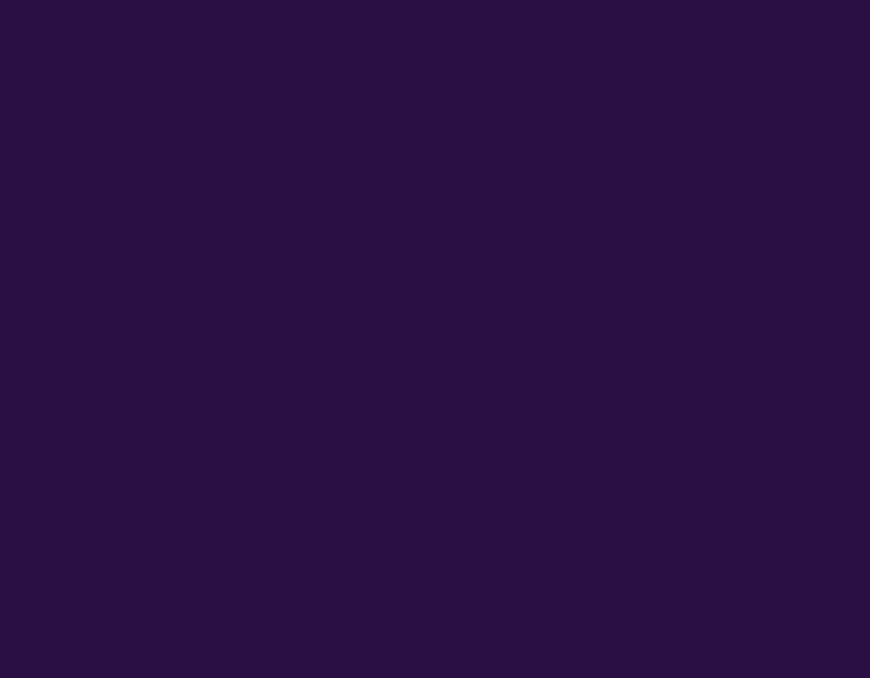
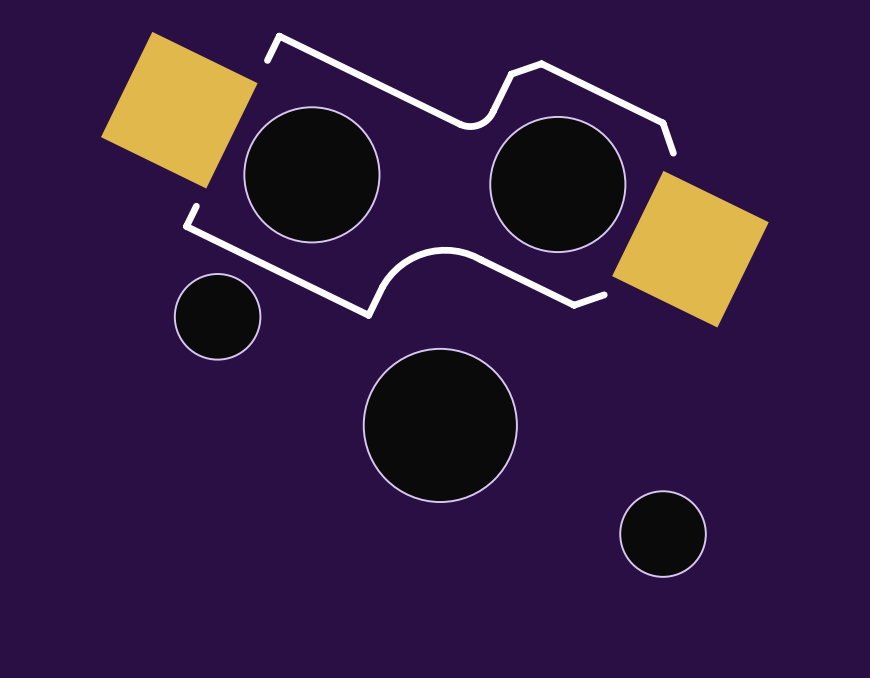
part: none -> (434, 304)

